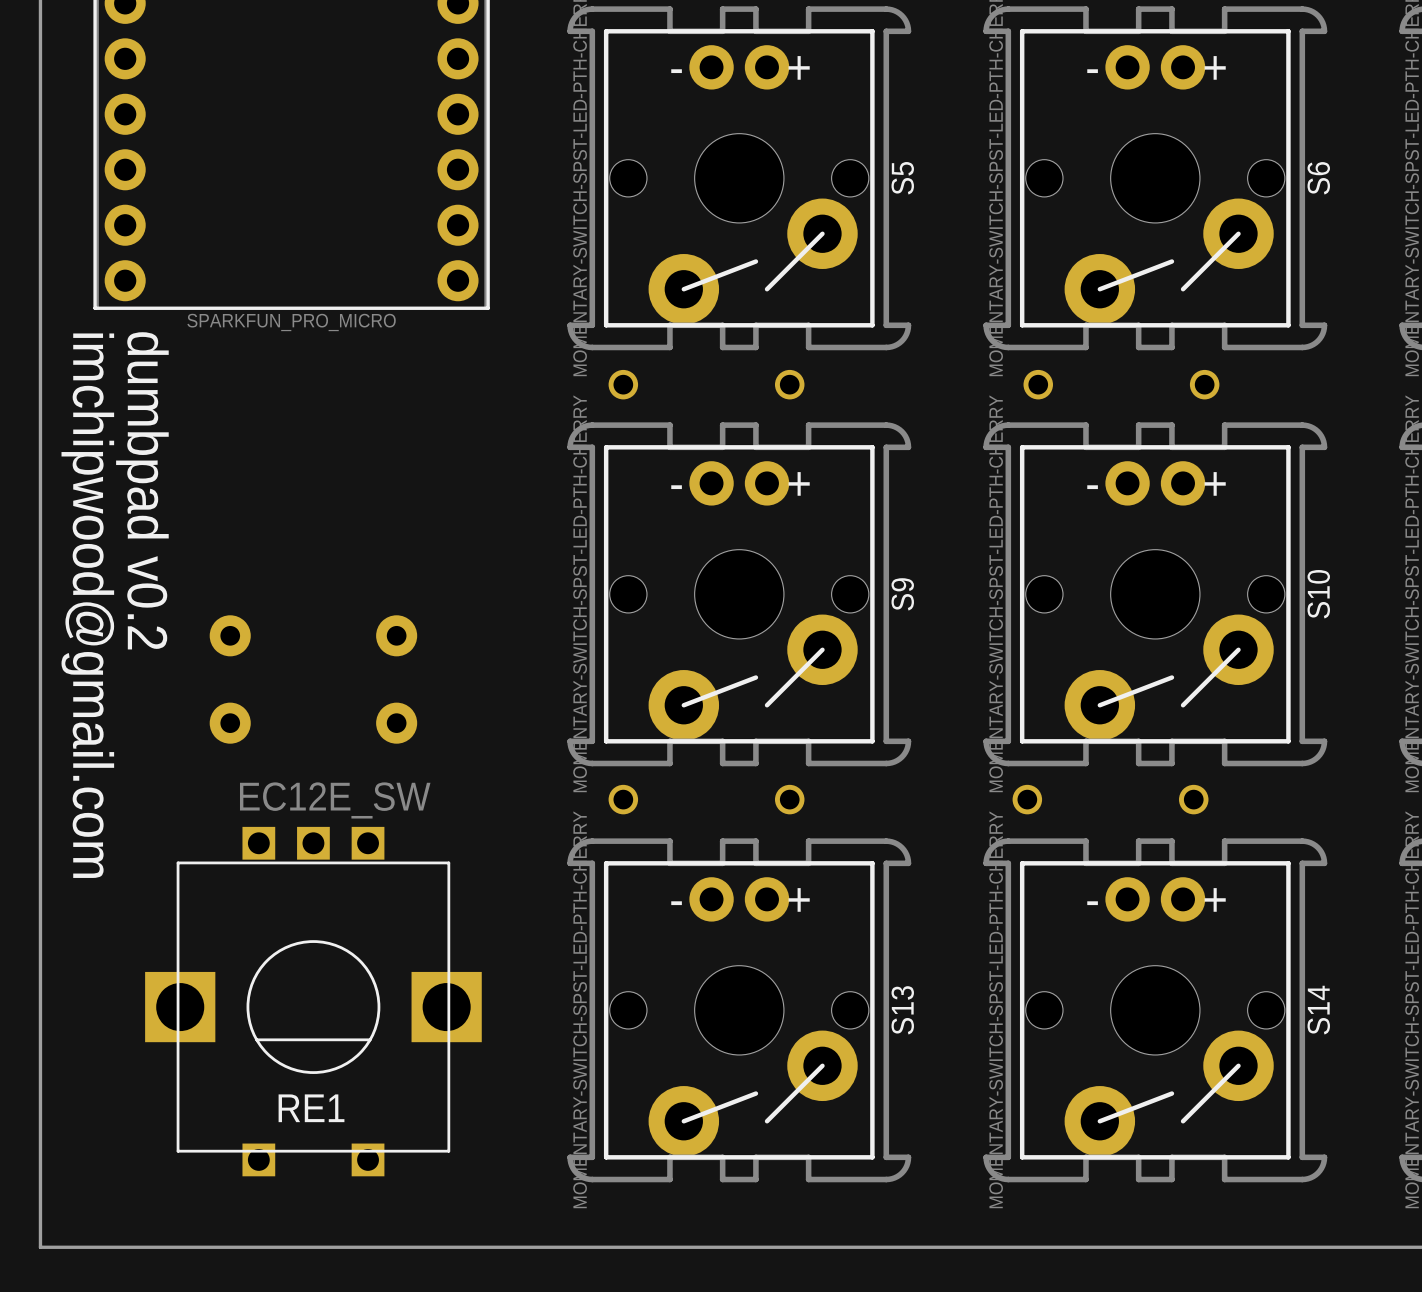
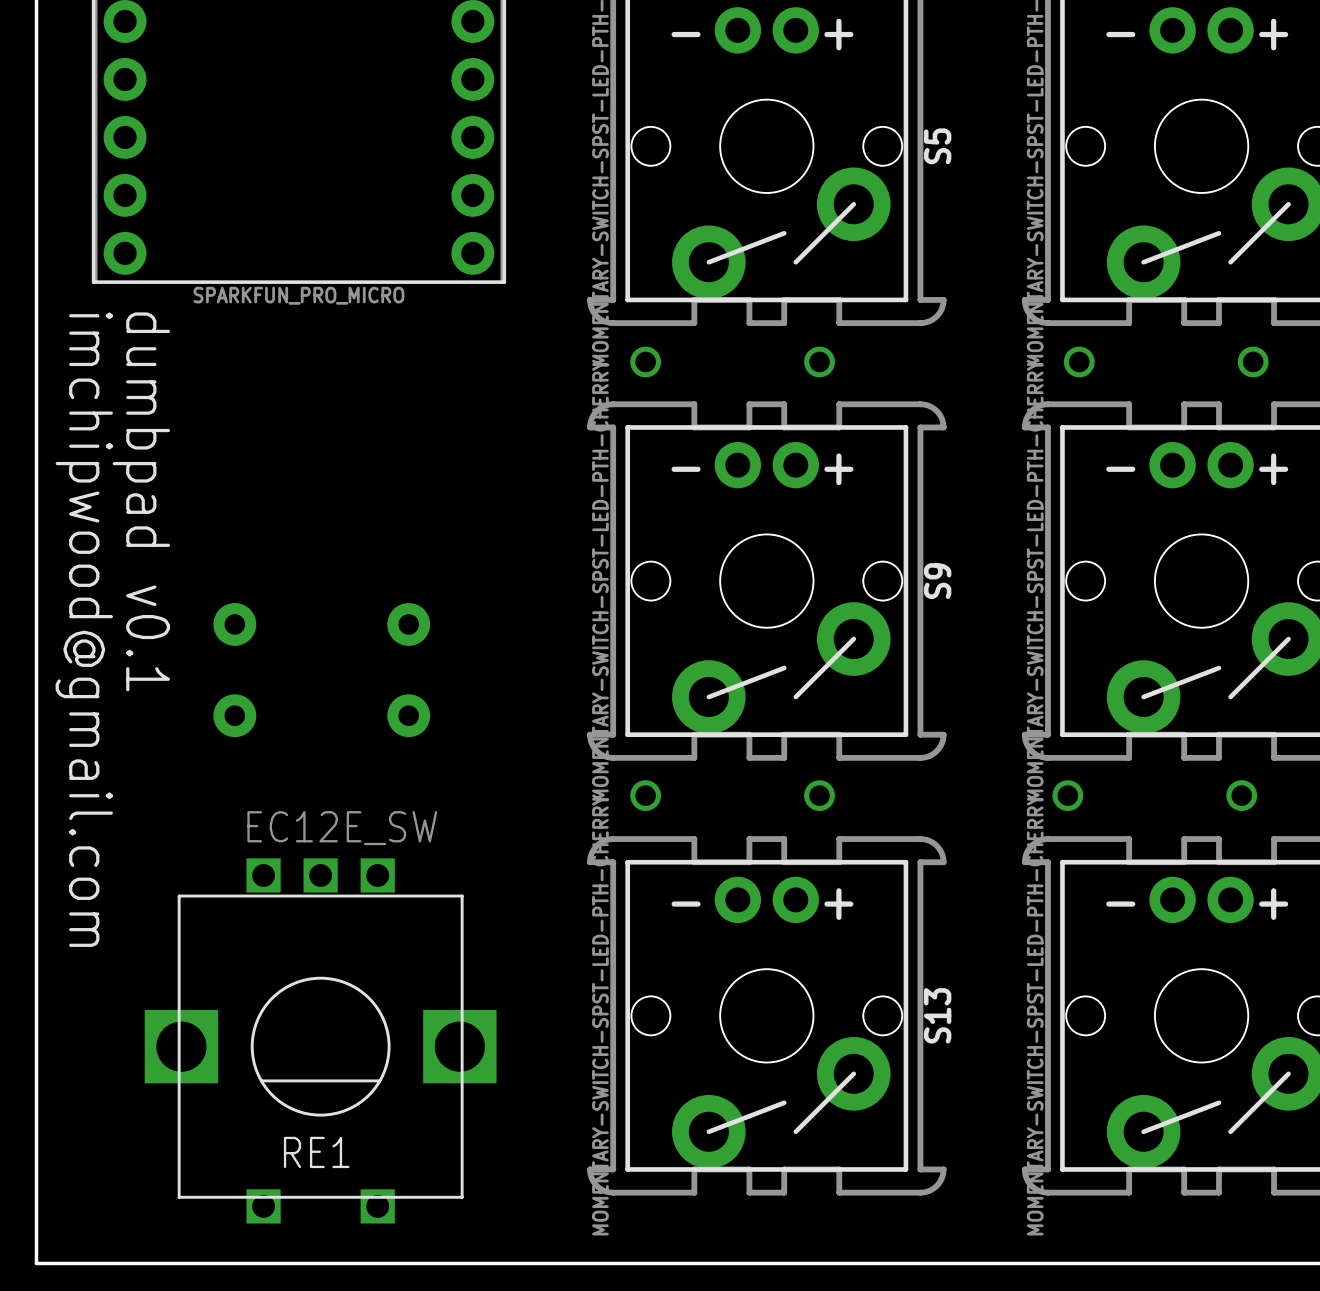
text: dumbpad v0.2 (142, 490) -> dumbpad v0.1 (141, 501)
RE1 position: (313, 1001) -> (320, 1040)

